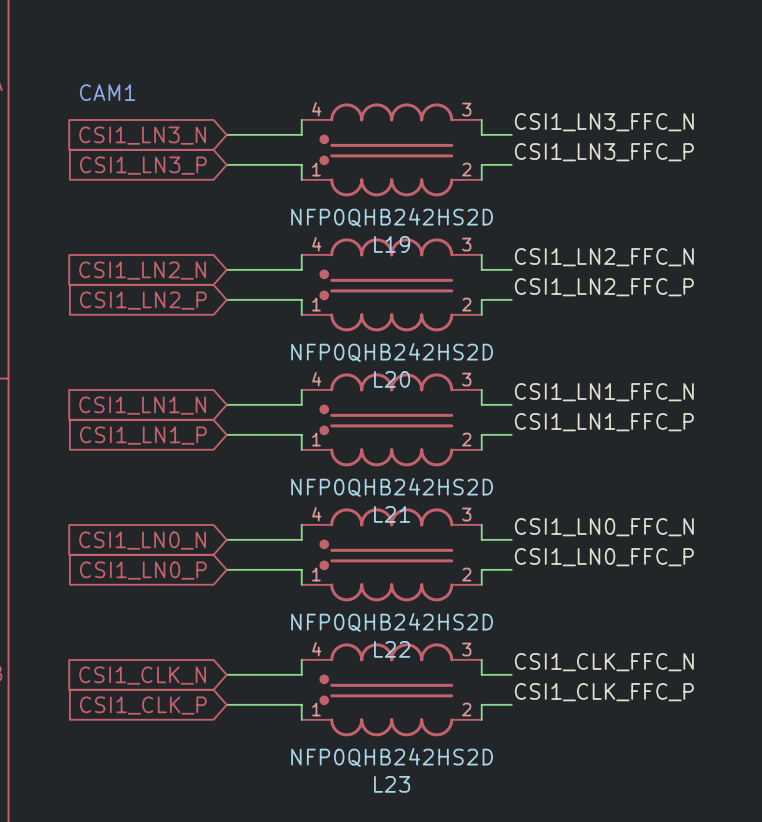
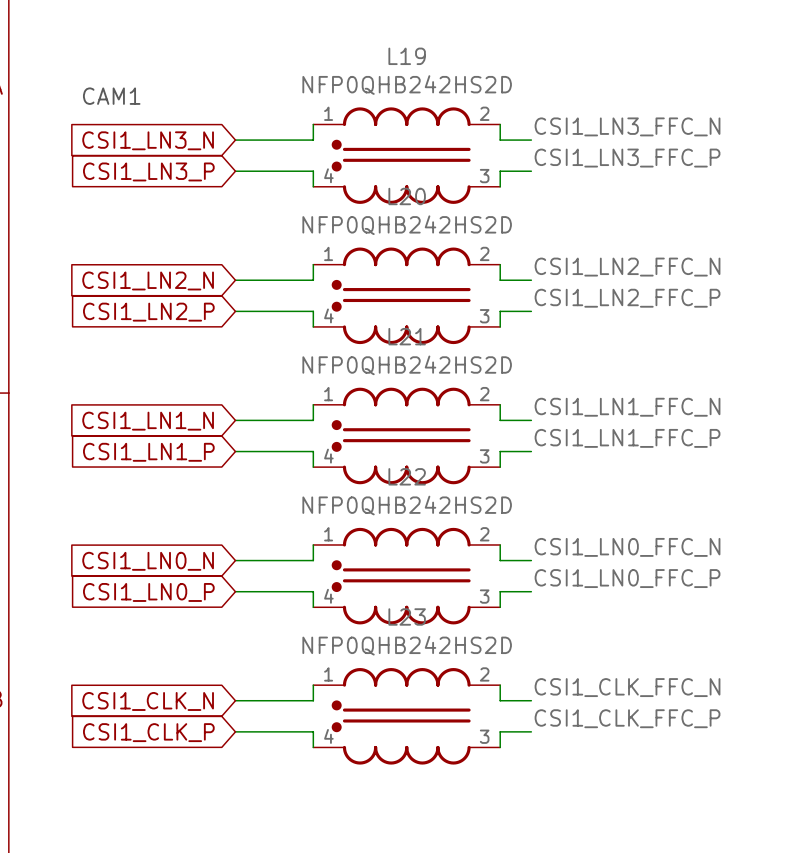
L19 flip: as is (386, 149) -> up-down (401, 155)
L20 flip: as is (386, 284) -> up-down (401, 295)
L21 flip: as is (386, 419) -> up-down (401, 435)
L22 flip: as is (386, 554) -> up-down (401, 576)
L23 flip: as is (386, 689) -> up-down (401, 716)

